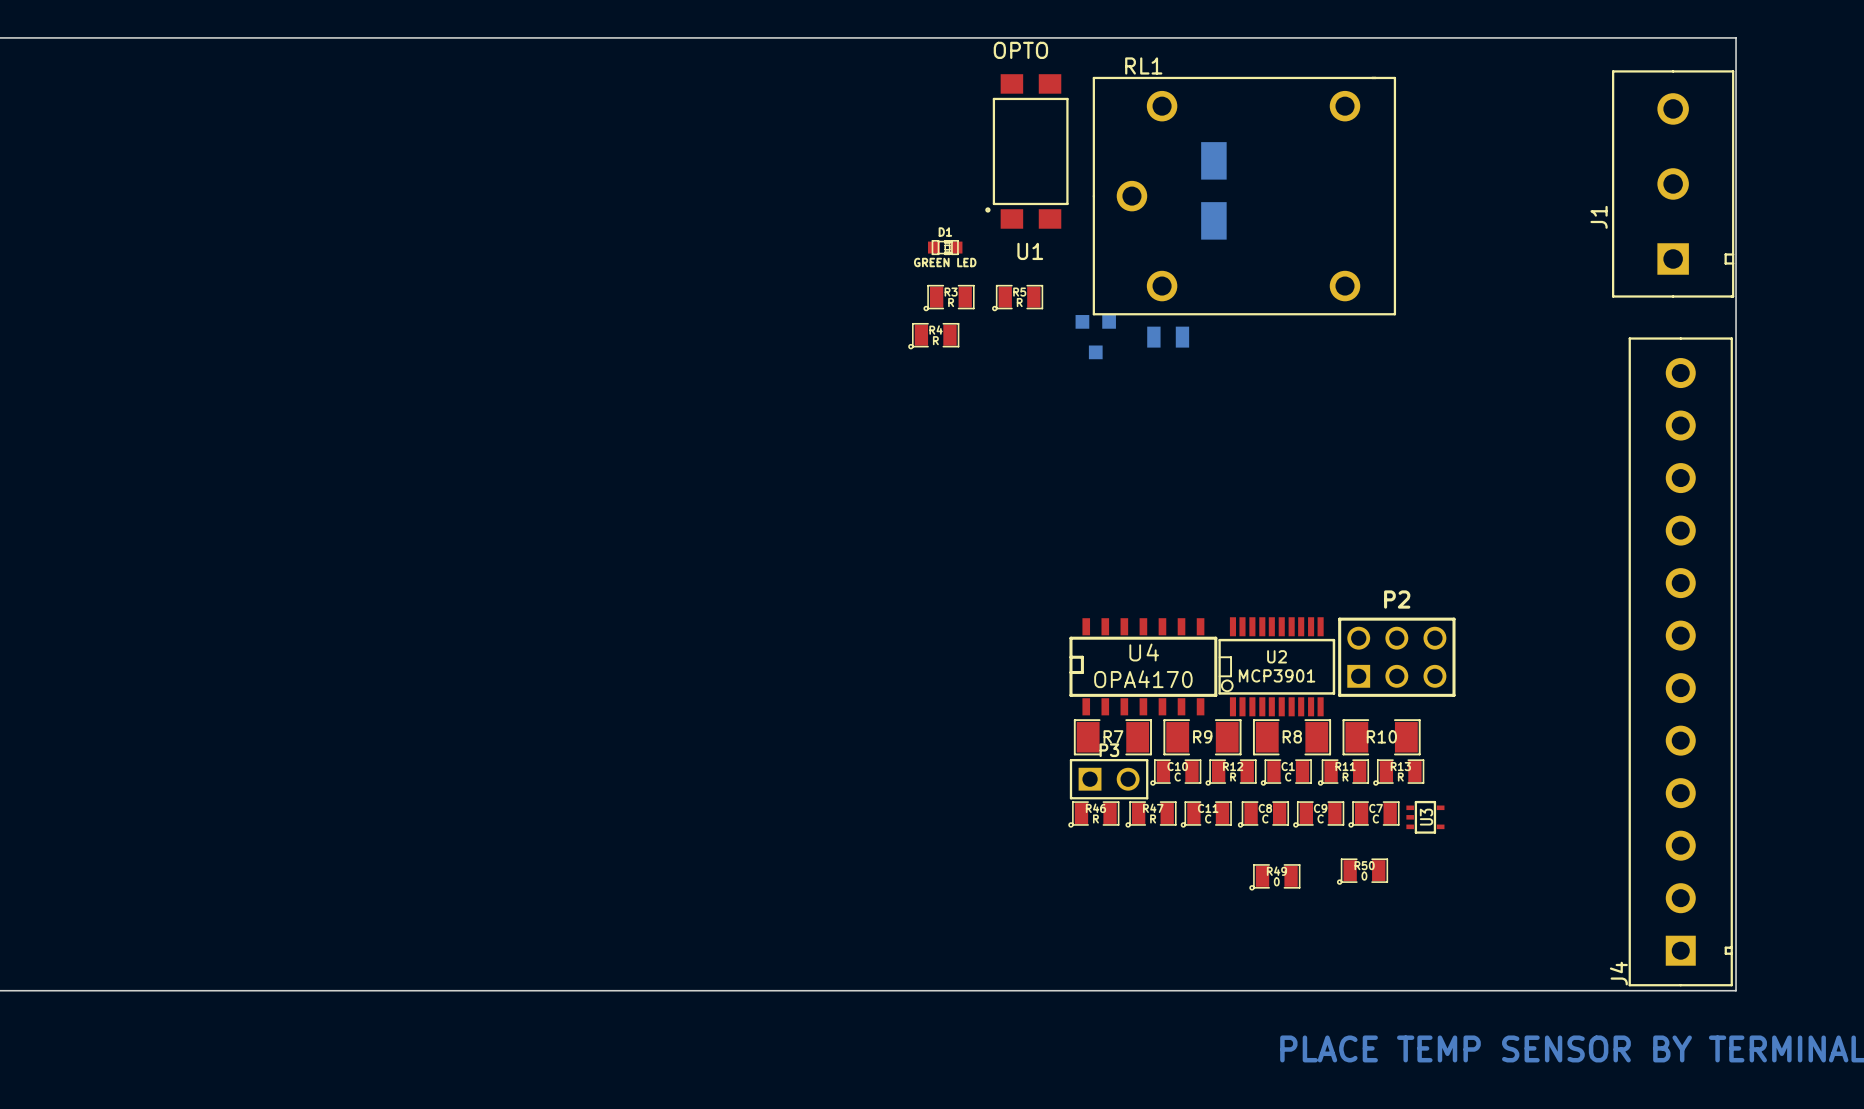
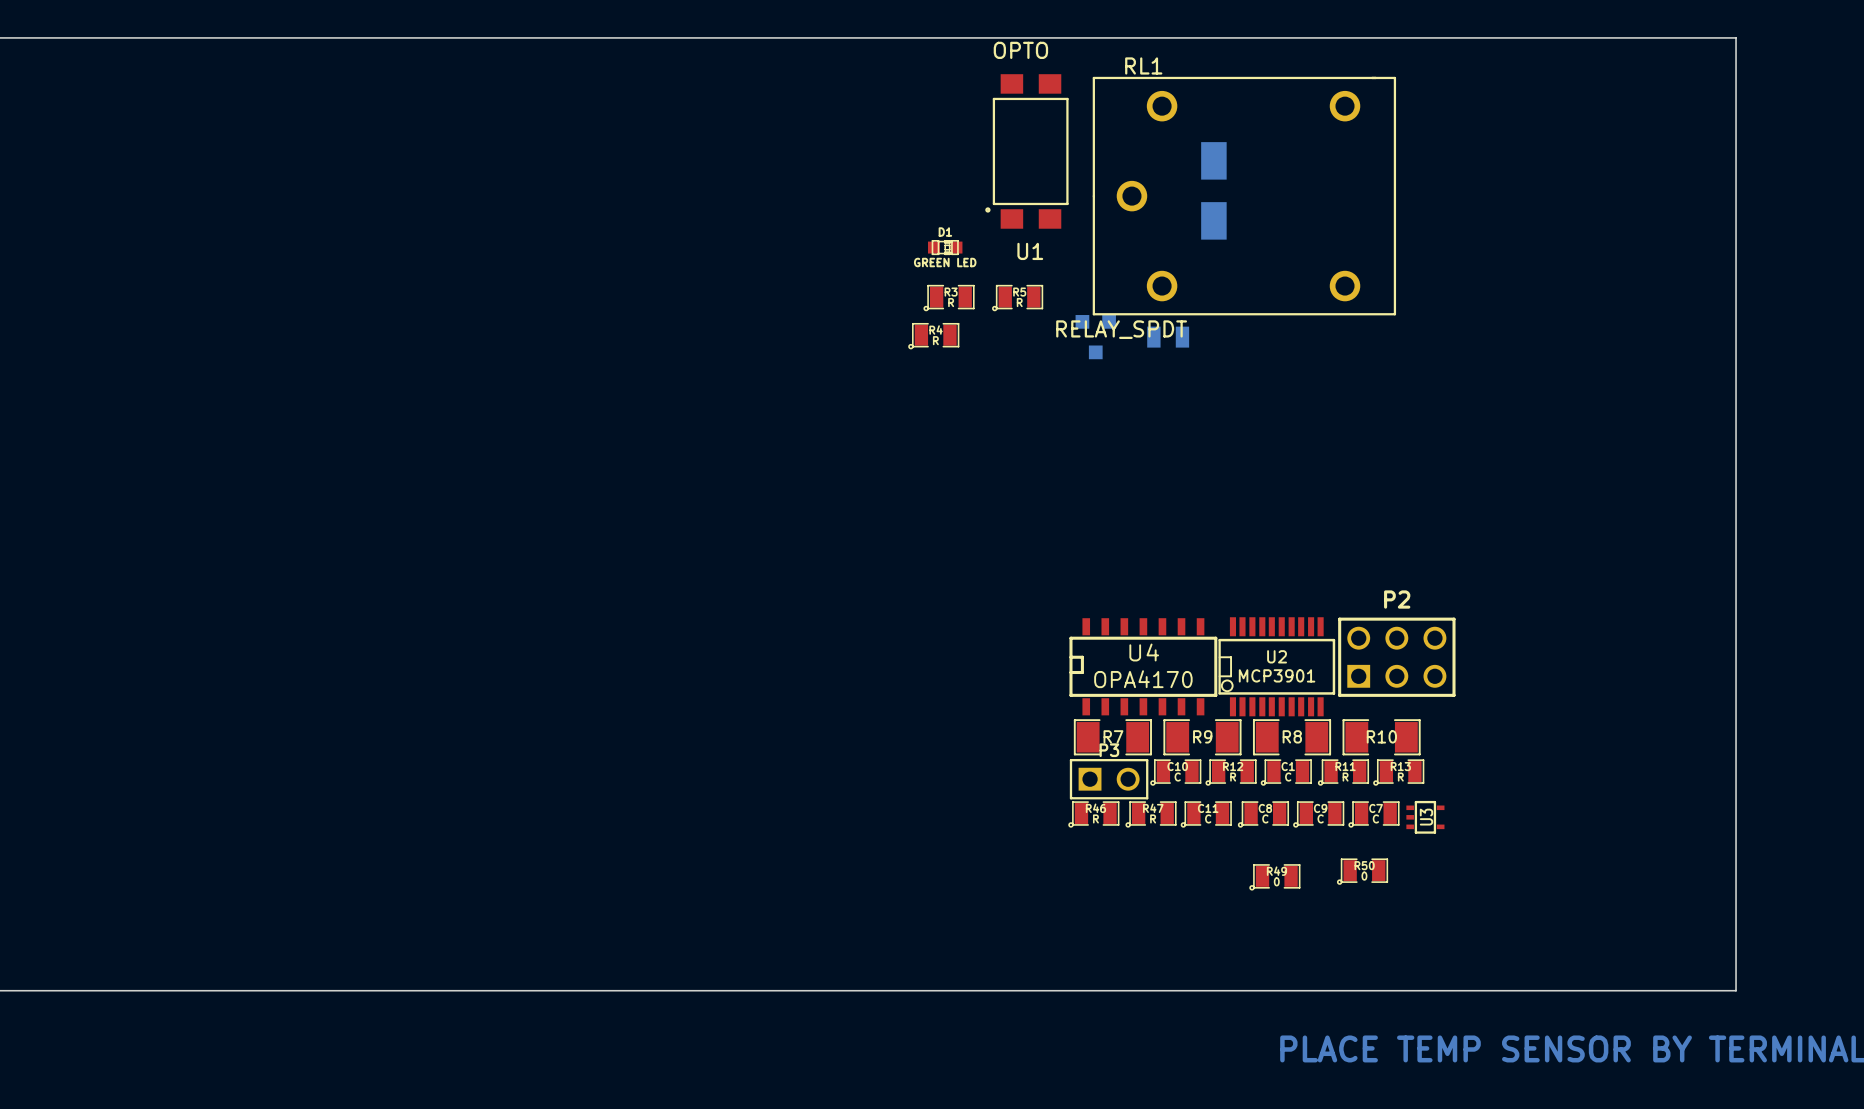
J1: (1673, 183) -> none
RL1 value: none -> RELAY_SPDT (1121, 329)
J4: (1680, 661) -> none

